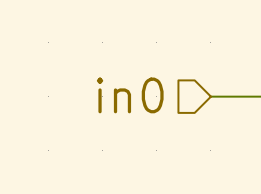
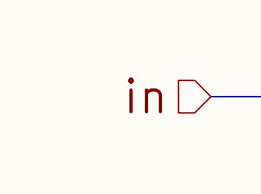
hierarchical label: in0 (130, 95) -> in (144, 95)

